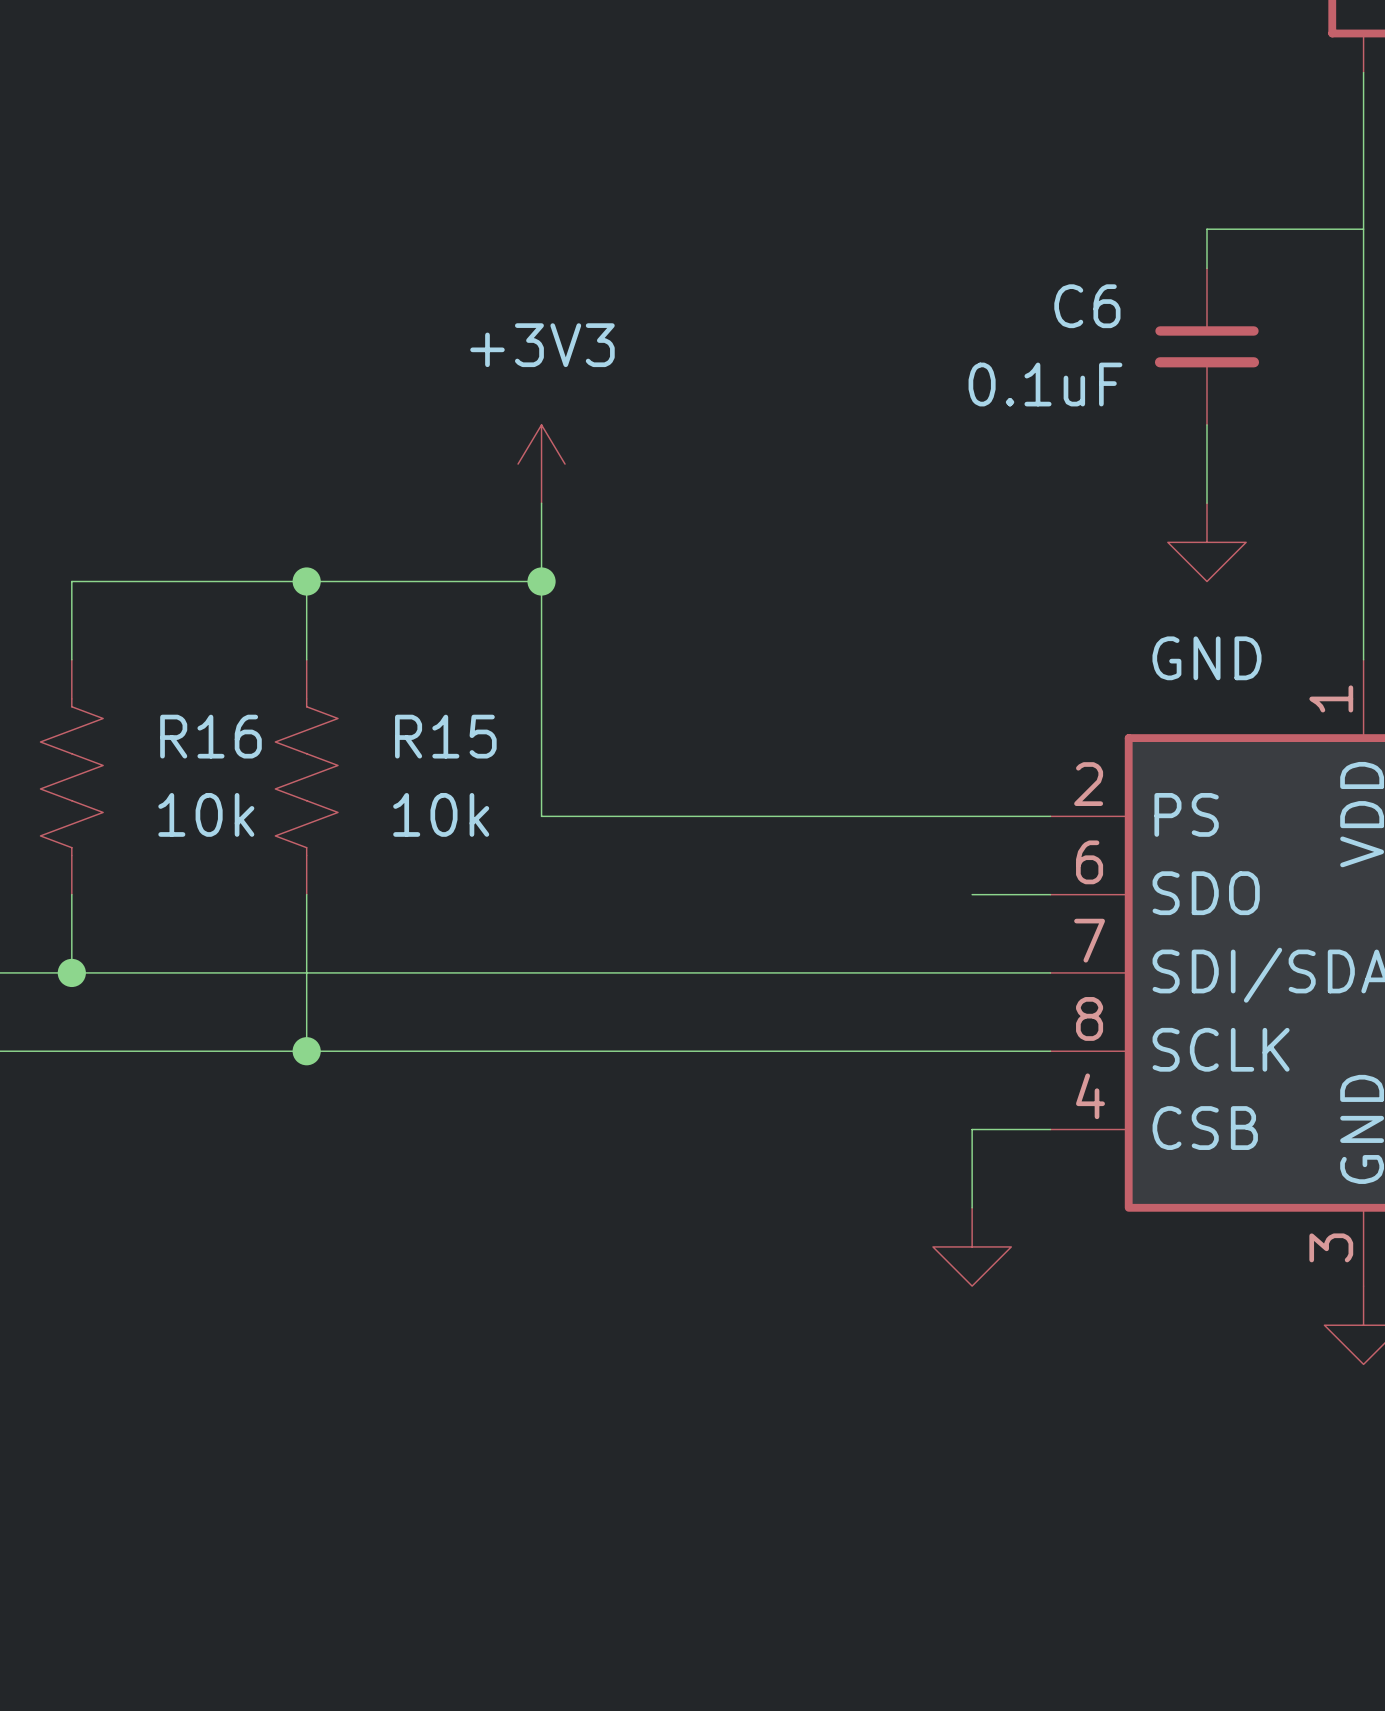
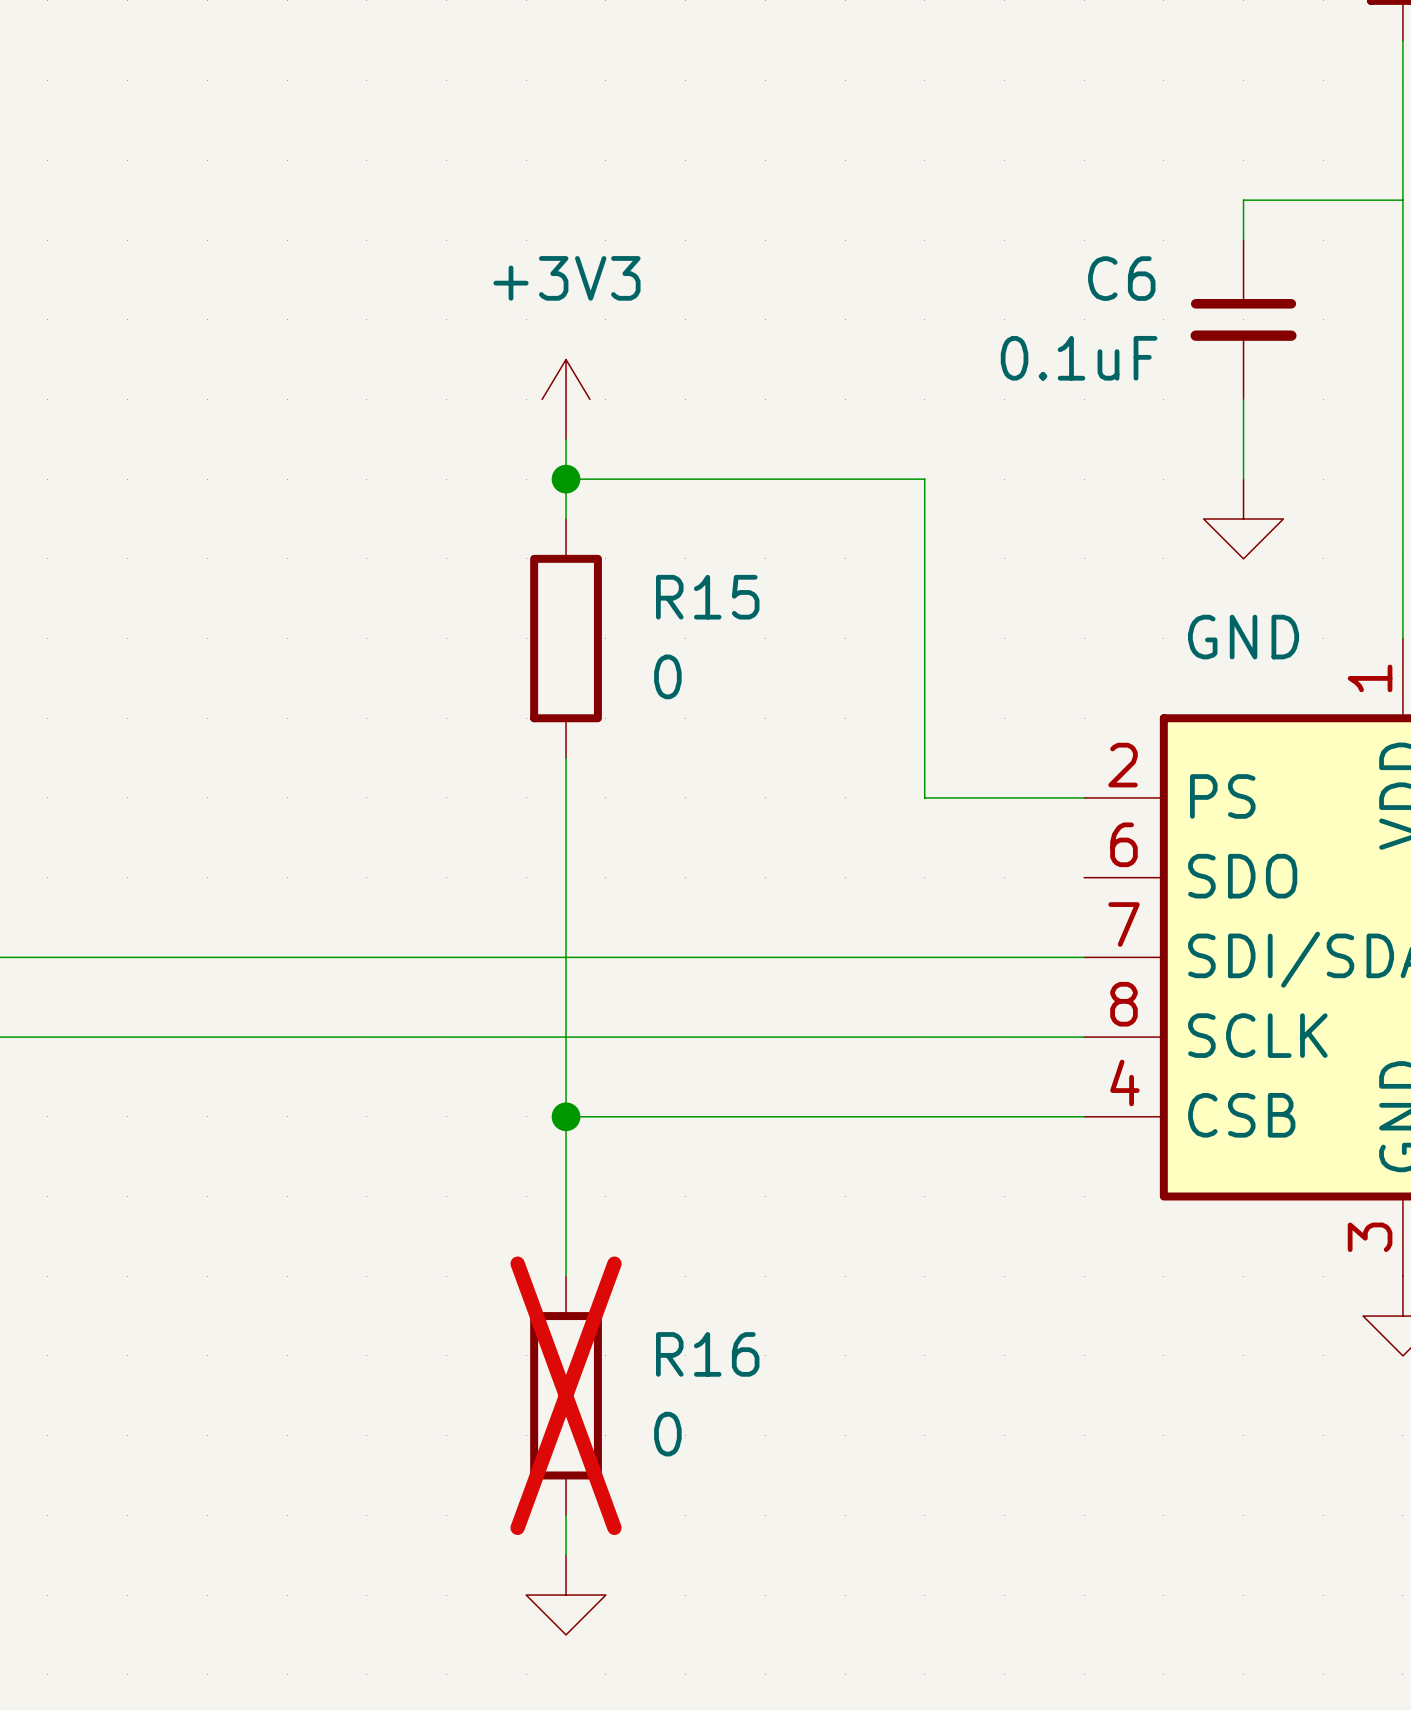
power symbol position: +3V3 (541, 464) -> +3V3 (566, 399)
wire: (541, 542) (541, 777) -> none
wire: (306, 581) (306, 659) -> none
junction: (306, 581) -> none
wire: (541, 581) (71, 581) (71, 659) -> none
junction position: (541, 581) -> (566, 479)
R16 symbol: [40, 659, 104, 895] -> [530, 1276, 602, 1516]
R15 symbol: [275, 659, 338, 895] -> [530, 518, 602, 759]
R16 value: 10k (206, 814) -> 0 (667, 1434)
R15 value: 10k (441, 814) -> 0 (667, 676)
wire: (541, 816) (893, 816) -> (566, 439) (566, 479) (924, 479) (924, 797)
wire: none -> (566, 797) (566, 1276)
wire: (71, 894) (71, 972) -> none
wire: (306, 894) (306, 1051) -> none
wire: (972, 894) (1050, 894) -> none
junction: (71, 972) -> none
junction: (306, 1051) -> none
junction: none -> (566, 1116)
wire: (972, 1129) (972, 1207) -> (1004, 1116) (566, 1116)
power symbol position: (972, 1246) -> (566, 1595)
R16 do-not-place cross: none -> (566, 1395)
wire: none -> (566, 1515) (566, 1555)

